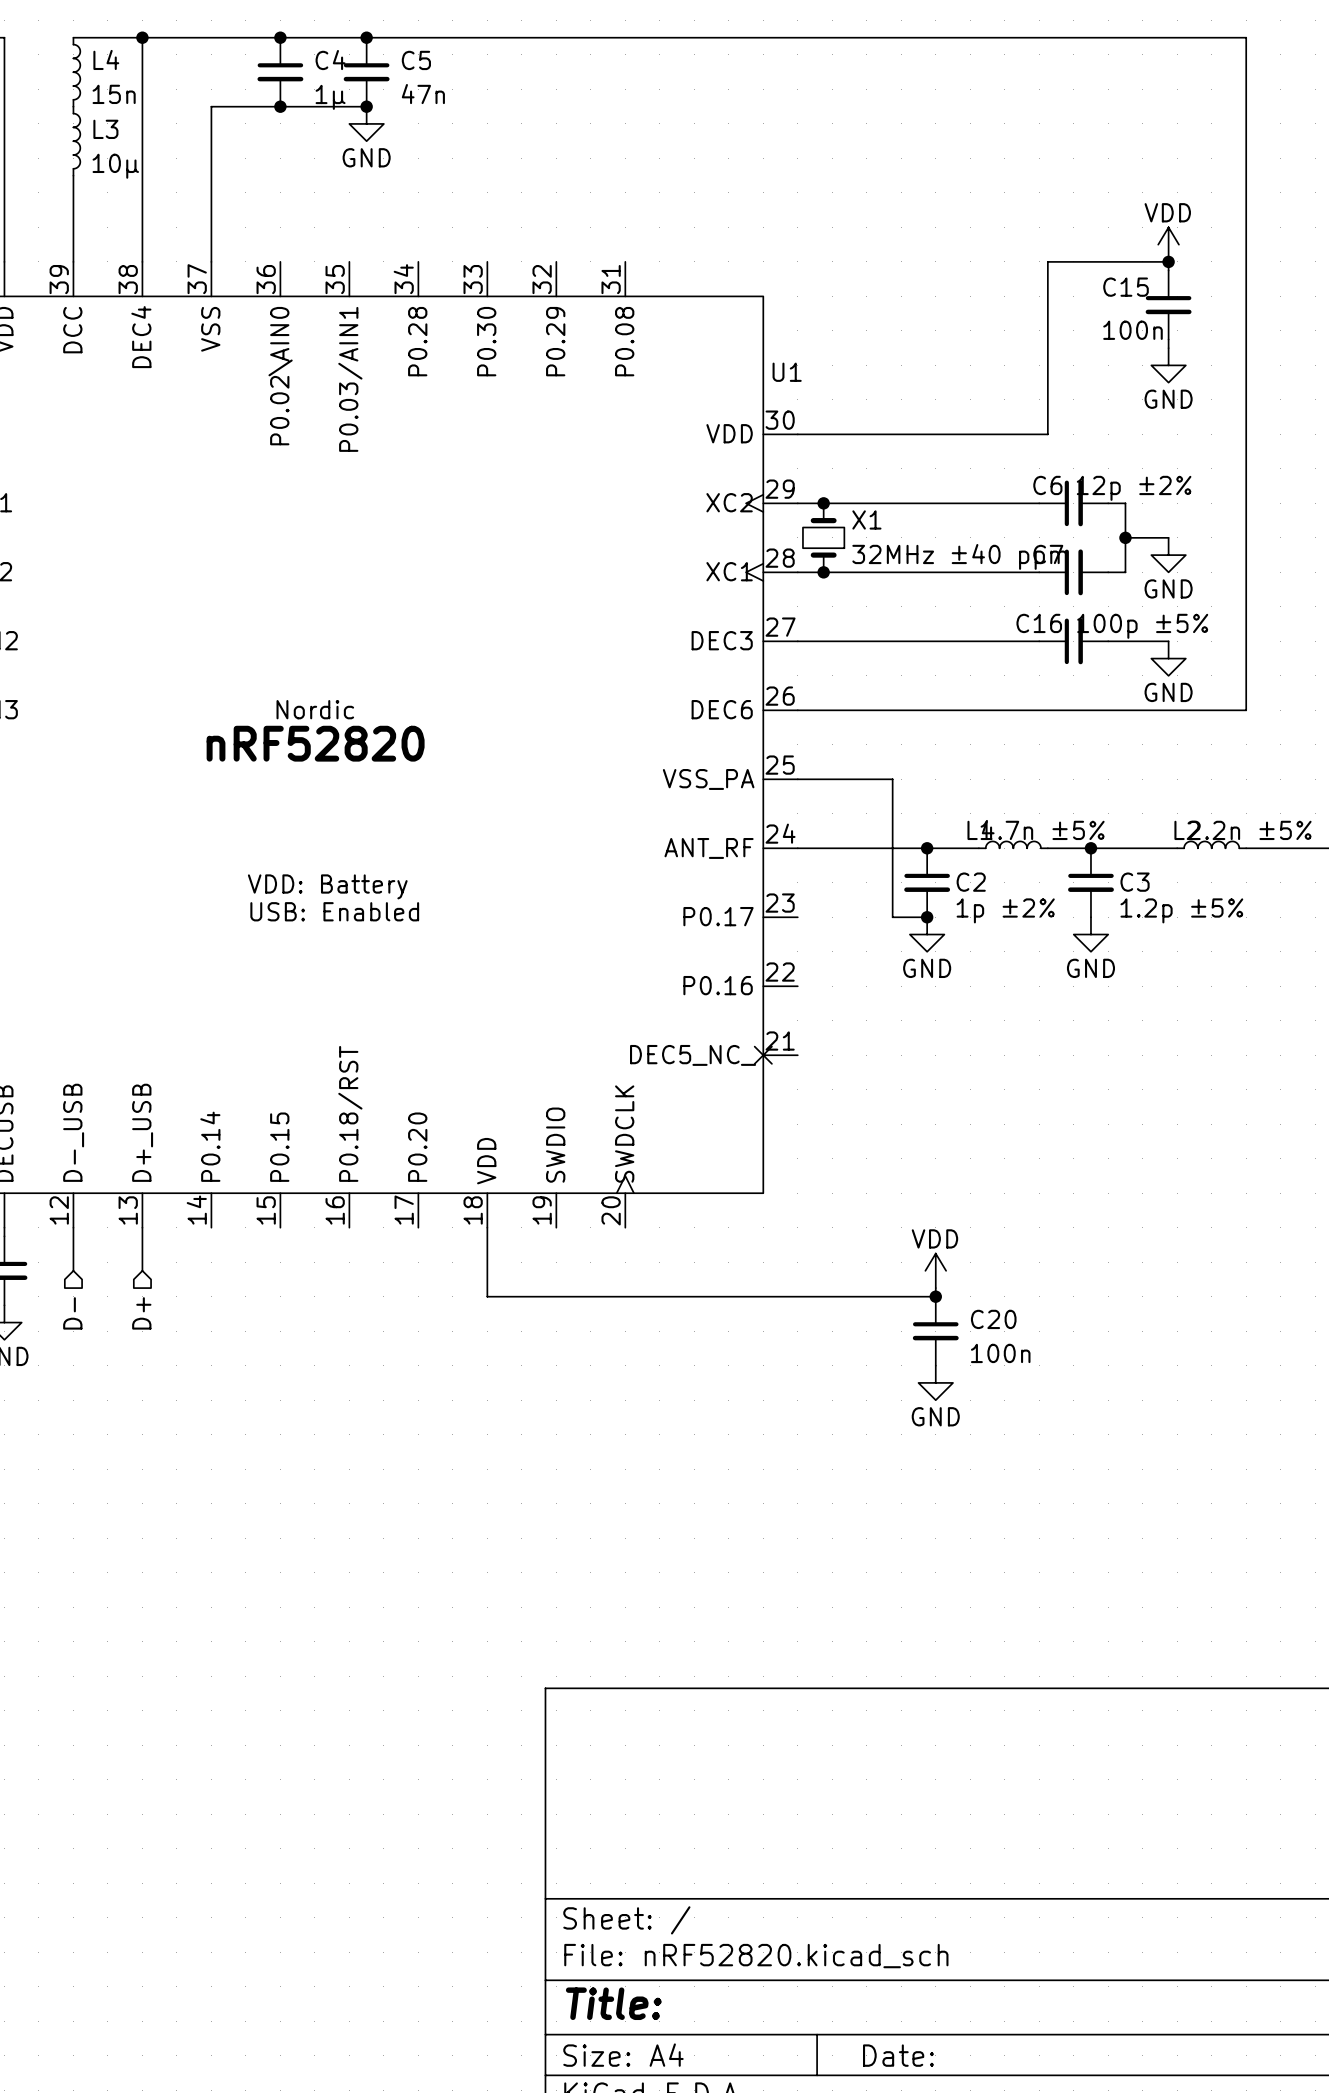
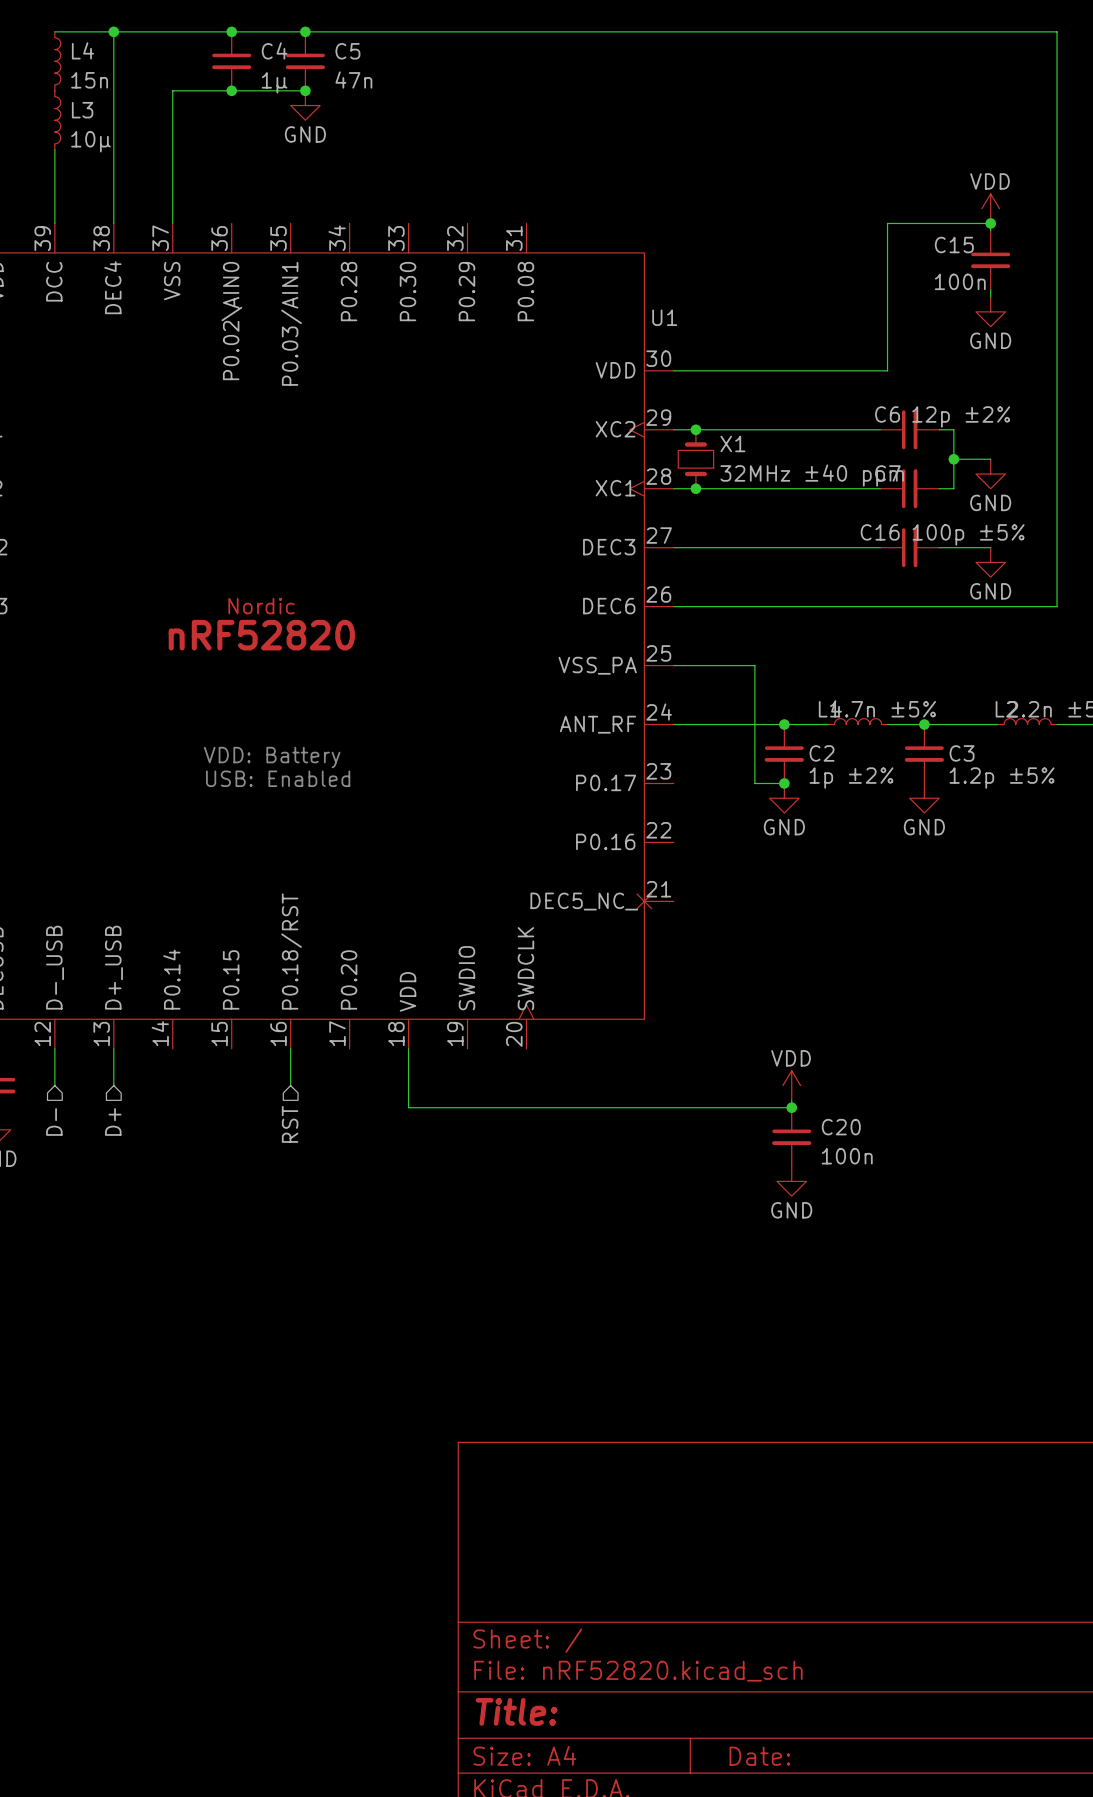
wire: none -> (290, 1048) (290, 1085)
hierarchical label: none -> RST (290, 1124)

